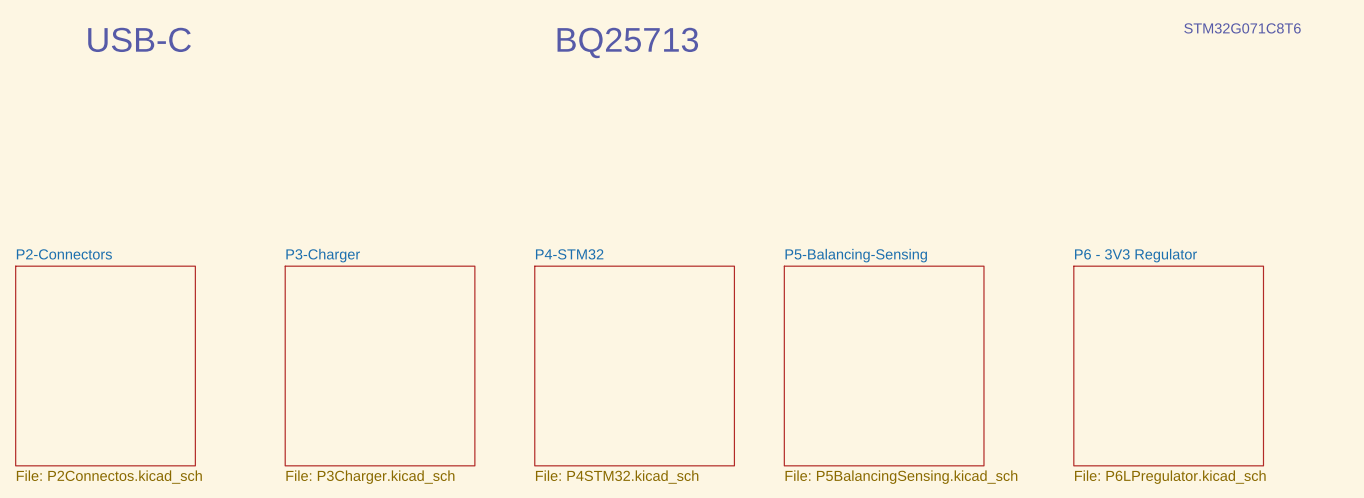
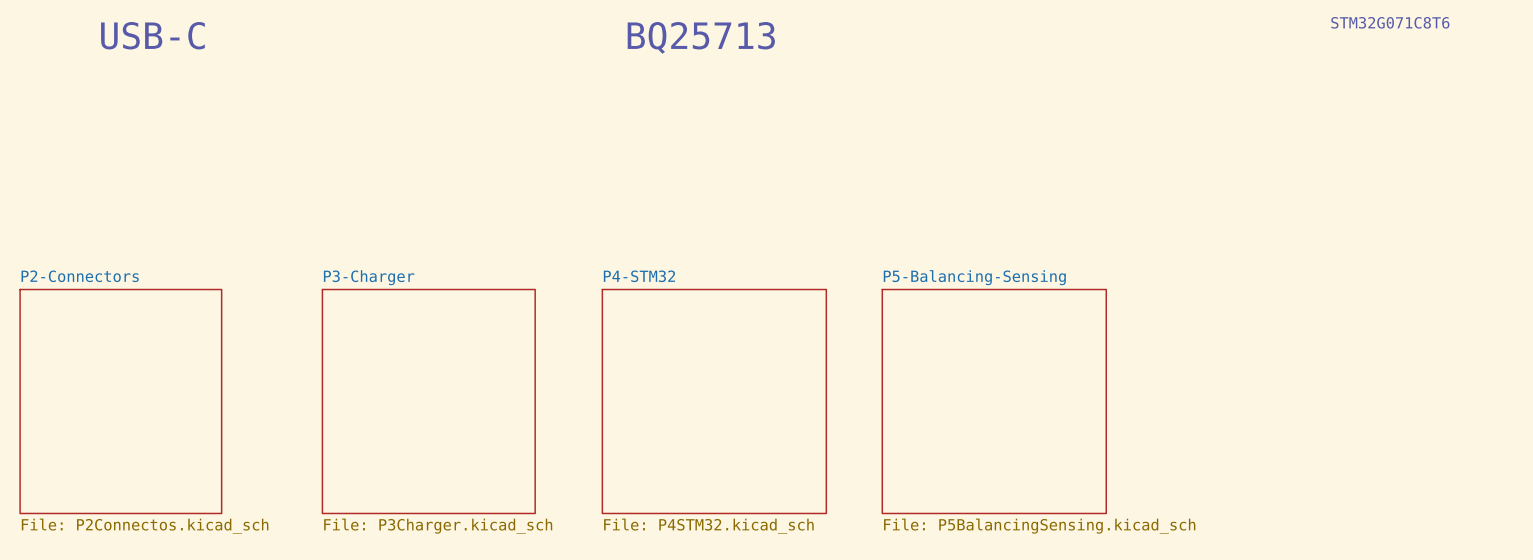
sheet P6 - 3V3 Regulator: File: P6LPregulator.kicad_sch (1168, 366) -> none

